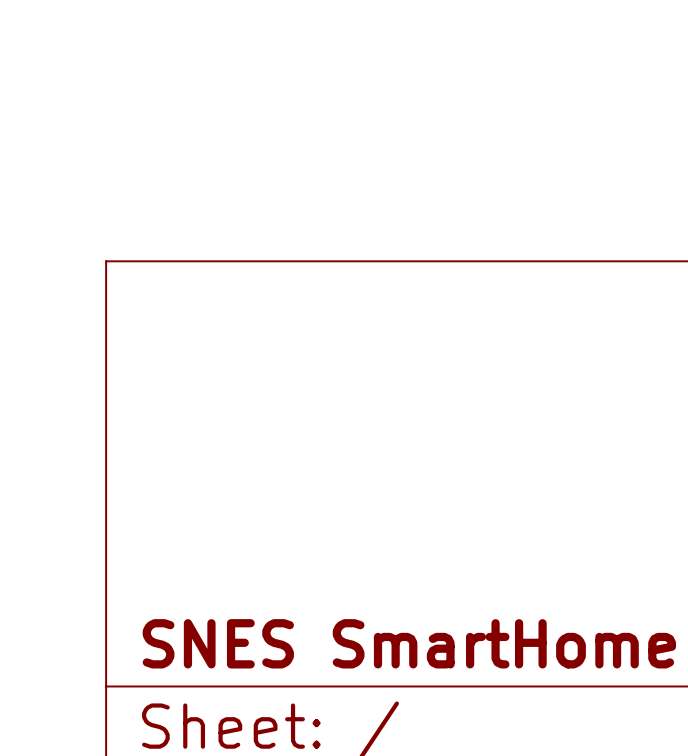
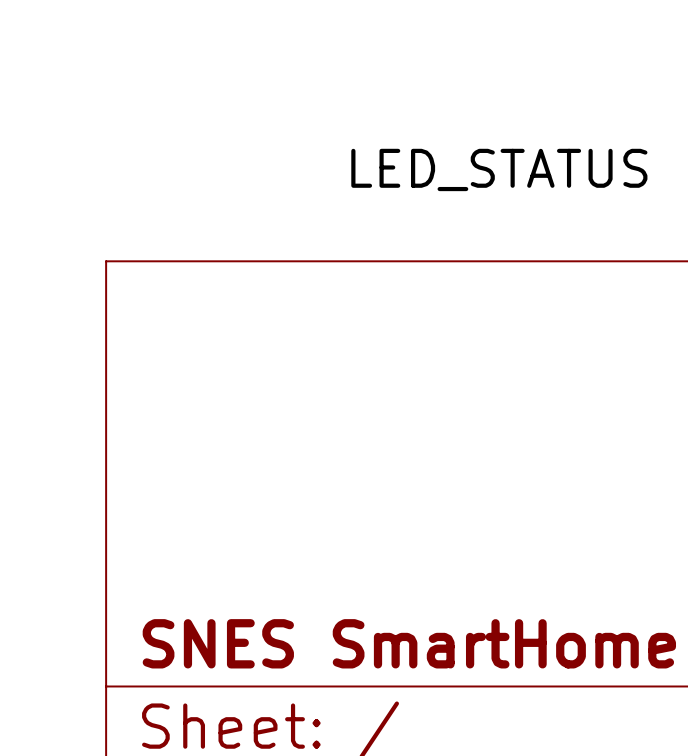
label: none -> LED_STATUS (499, 169)

